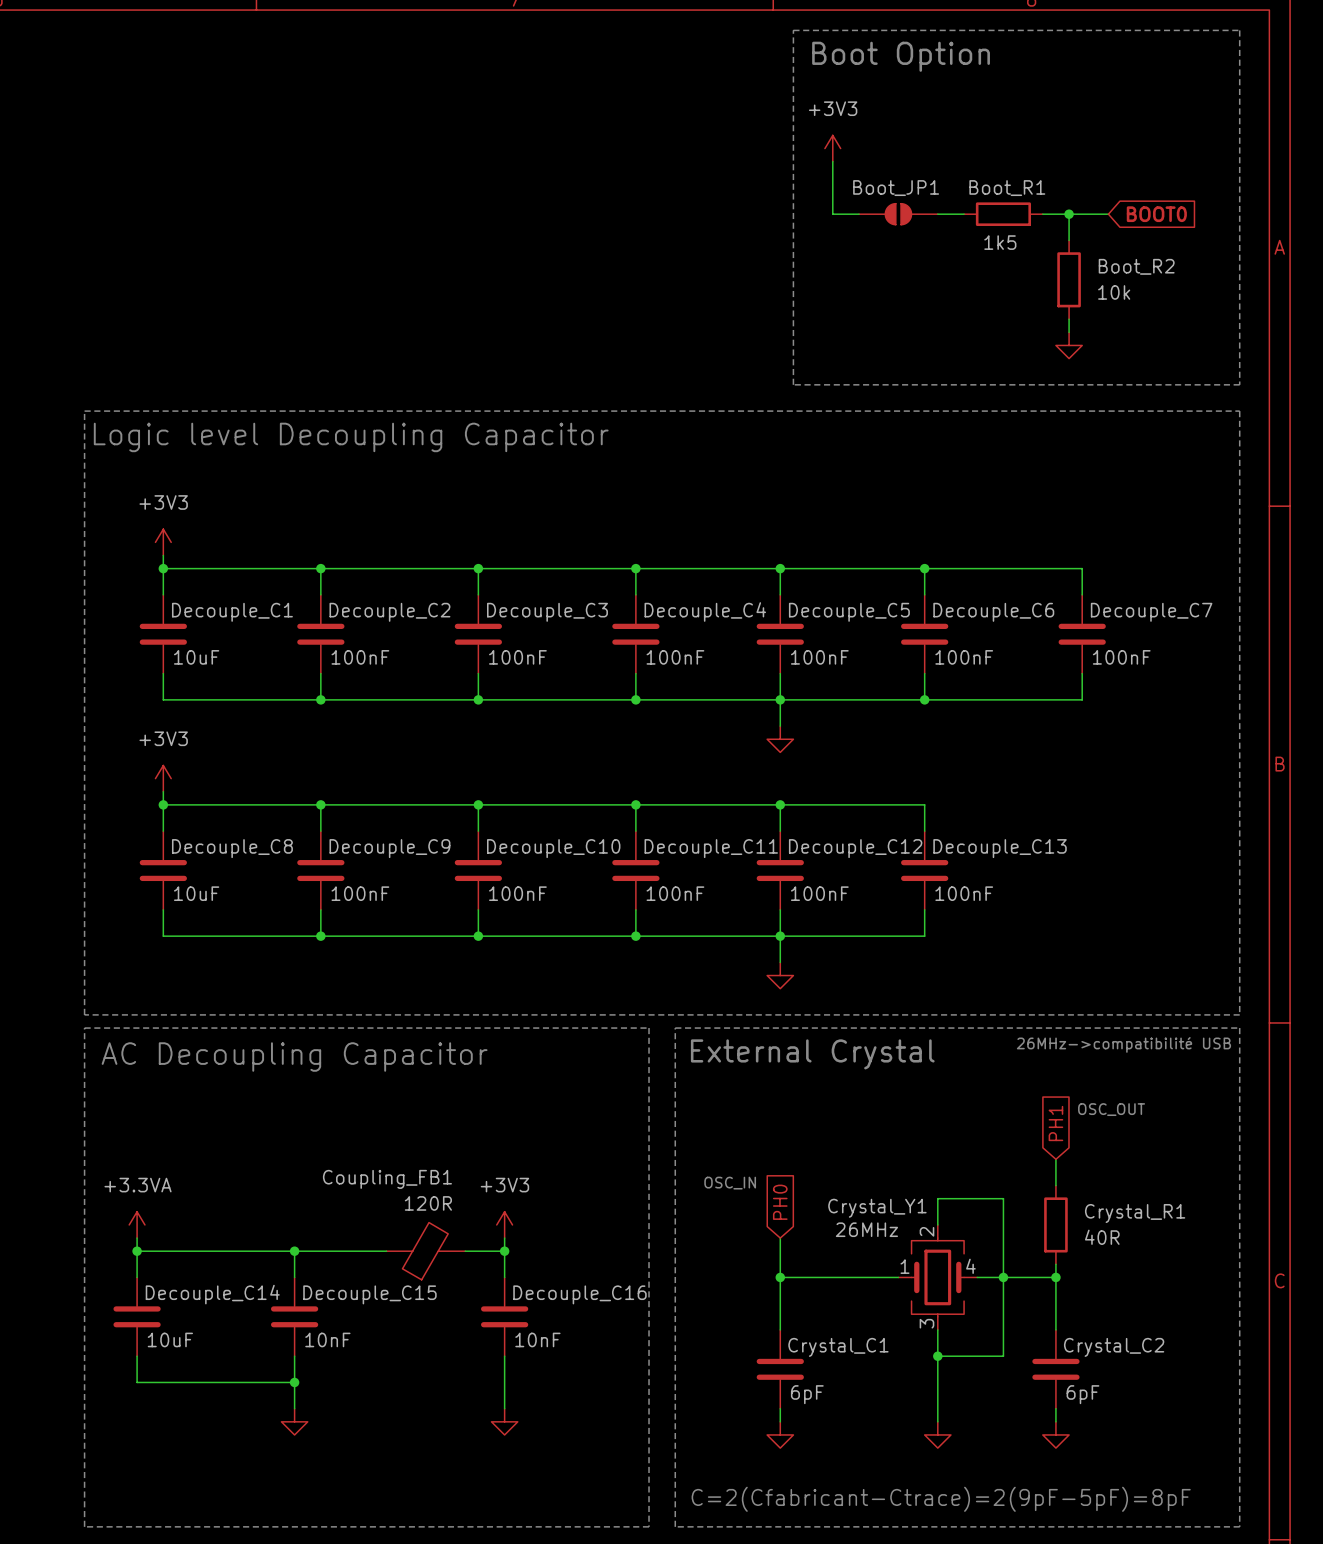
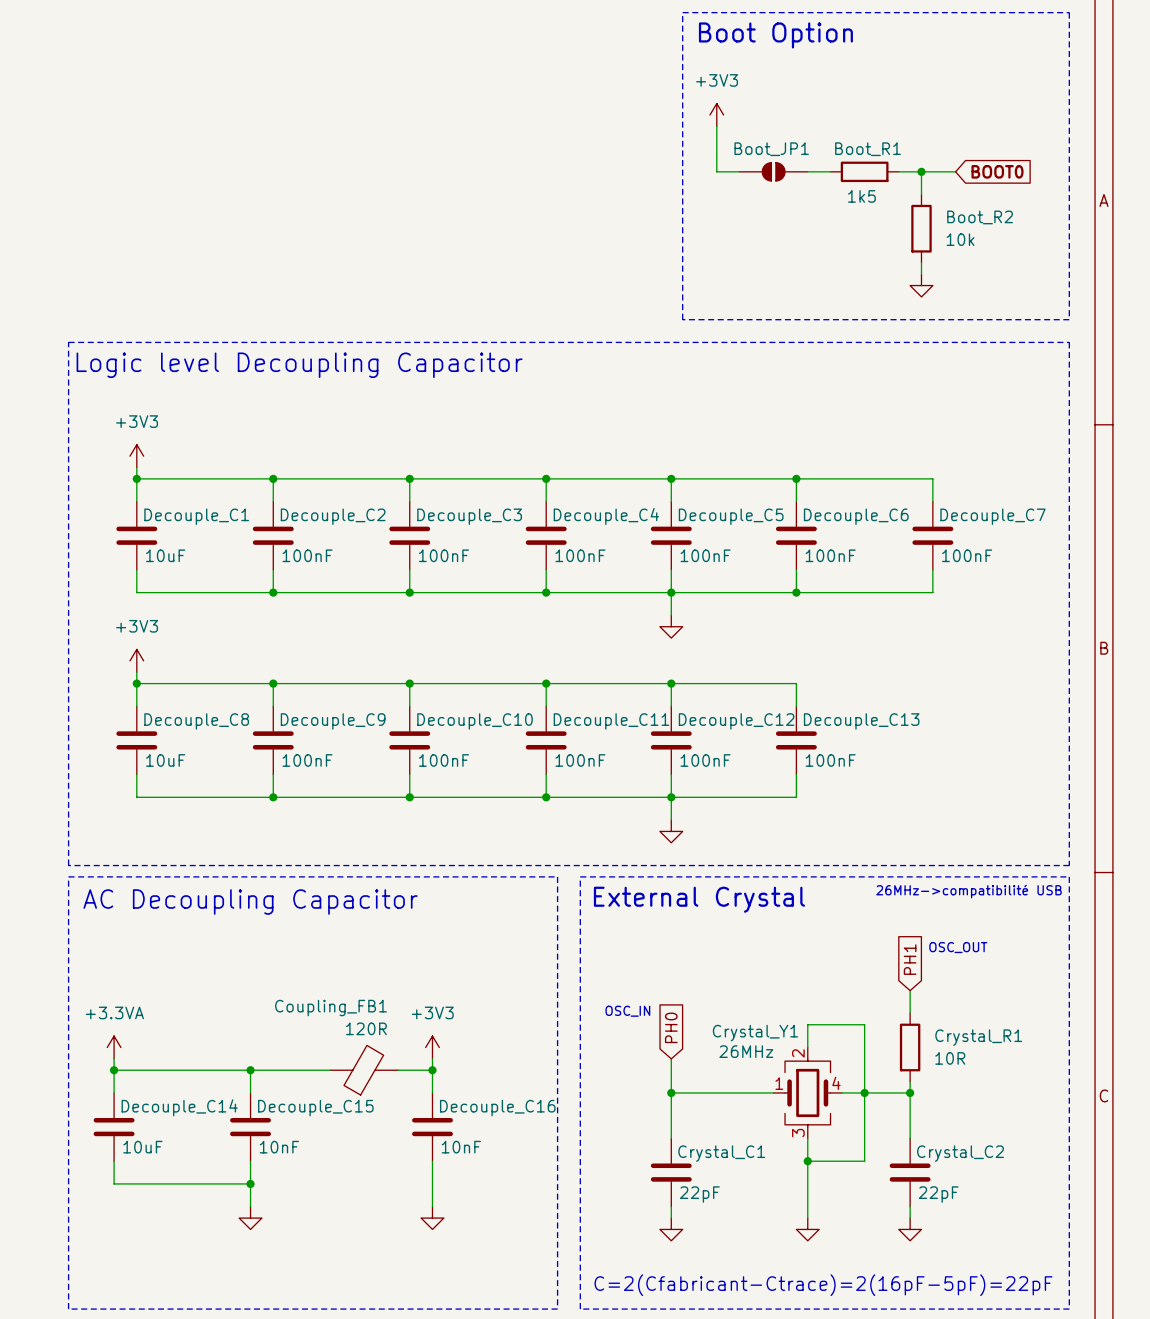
Crystal_R1 value: 40R (1102, 1237) -> 10R (950, 1058)
Crystal_C1 value: 6pF (807, 1394) -> 22pF (699, 1194)
Crystal_C2 value: 6pF (1082, 1394) -> 22pF (938, 1194)
text: C=2(Cfabricant-Ctrace)=2(9pF-5pF)=8pF (941, 1499) -> C=2(Cfabricant-Ctrace)=2(16pF-5pF)=22pF (823, 1285)

